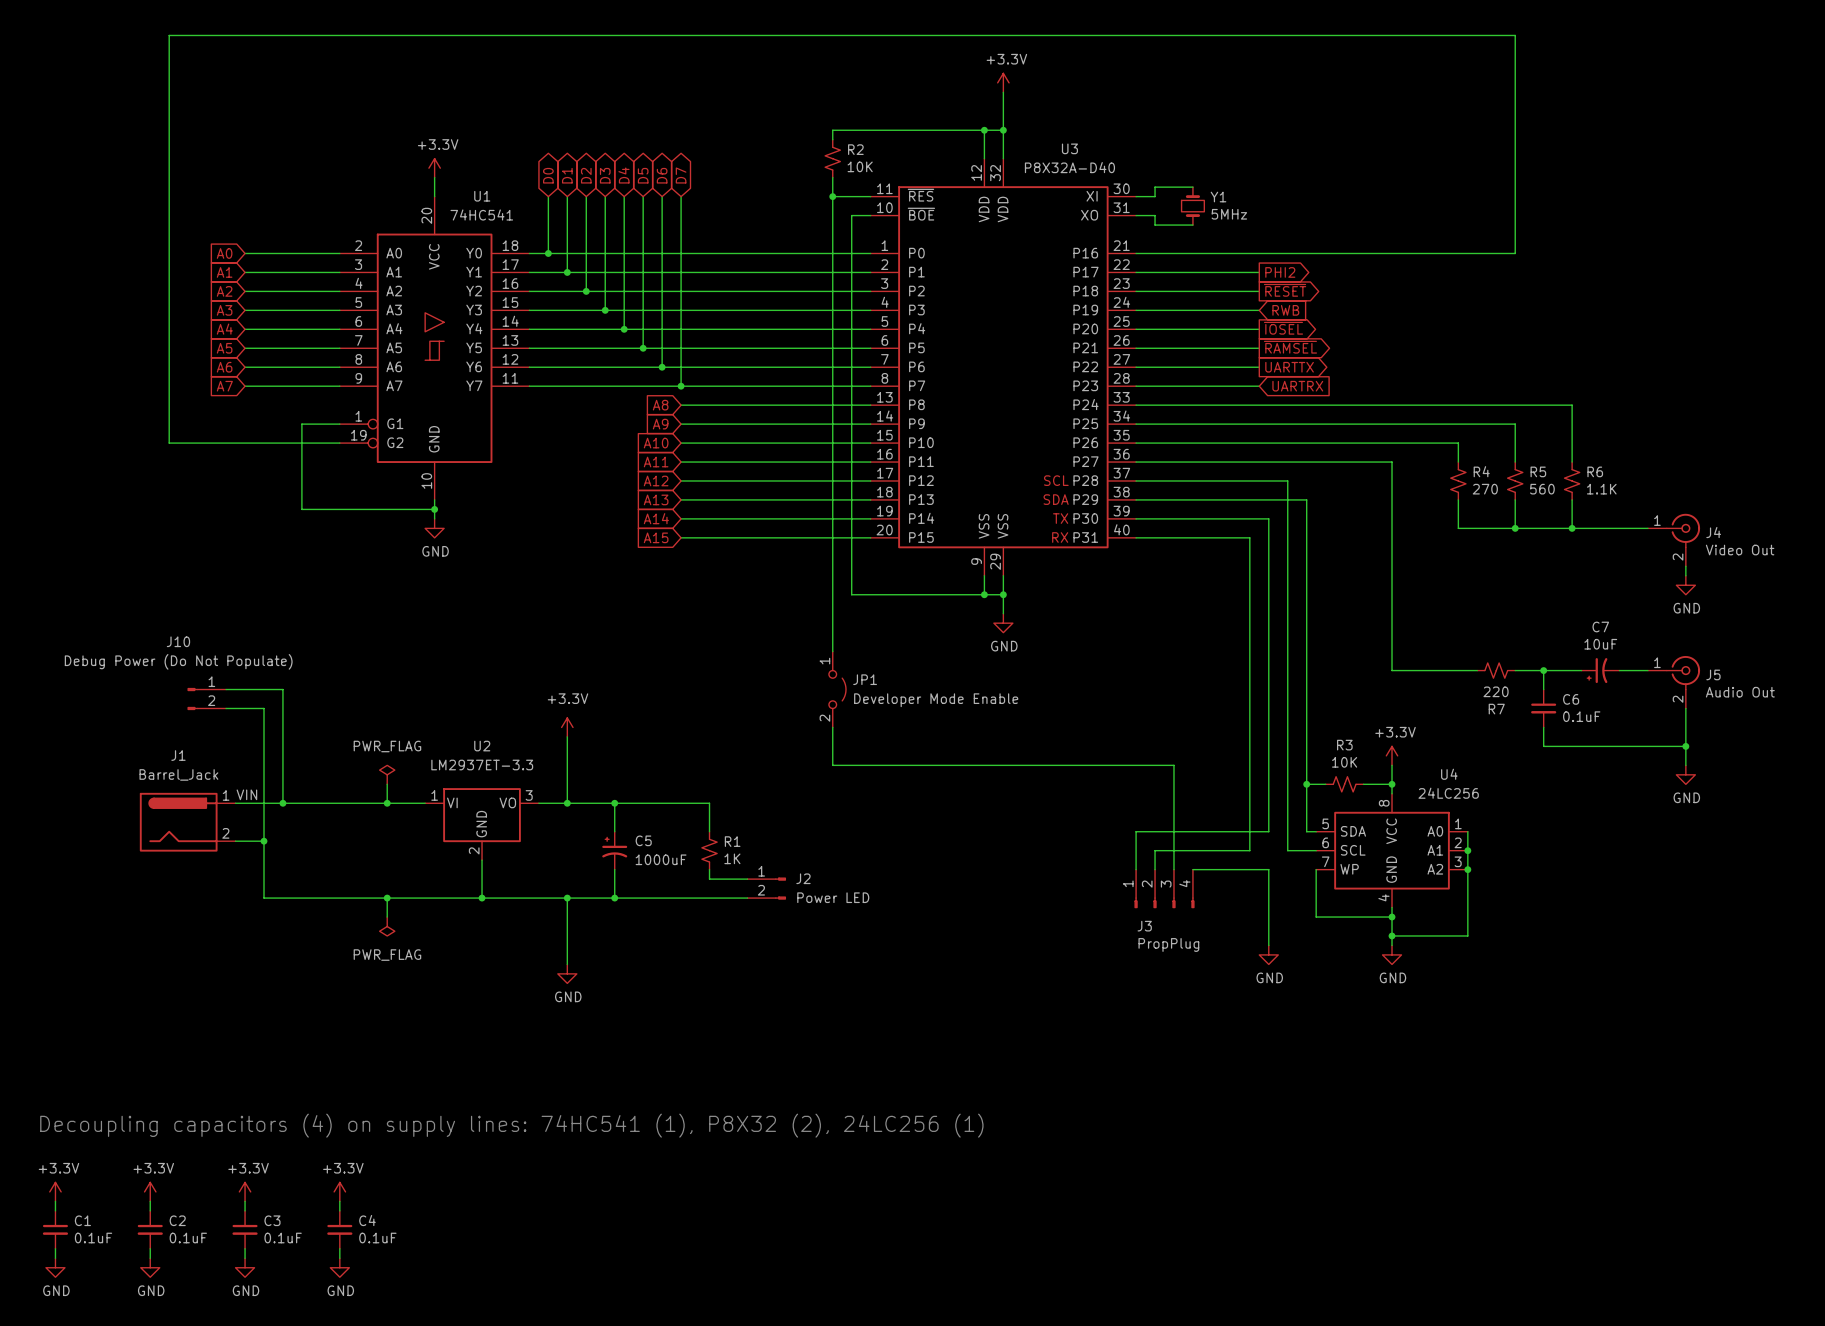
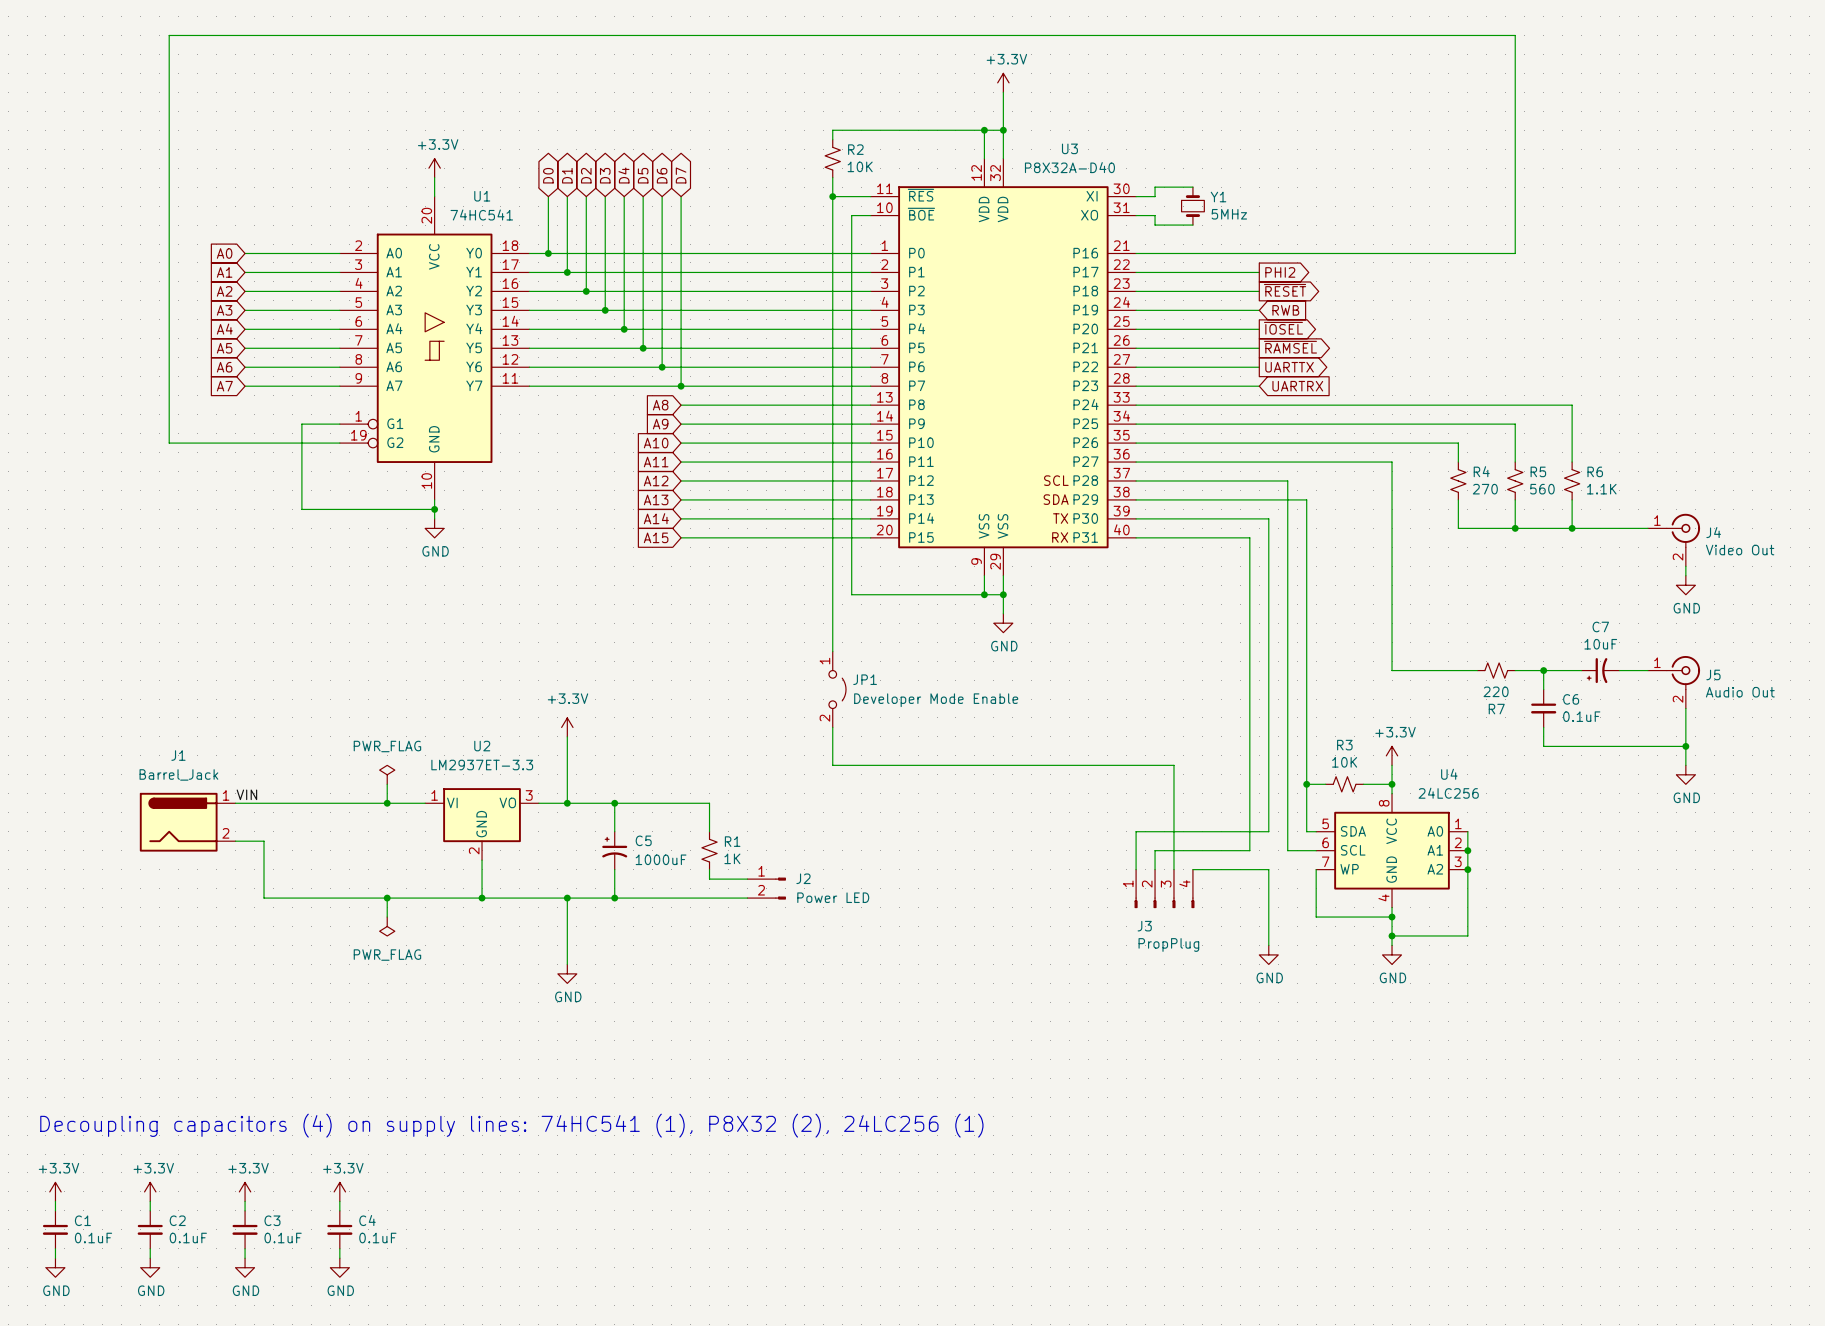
wire: (226, 689) (282, 689) (282, 803) -> none
J10: Debug Power (Do Not Populate) (206, 699) -> none
wire: (226, 708) (264, 708) (264, 841) -> none
junction: (282, 803) -> none
junction: (264, 841) -> none

